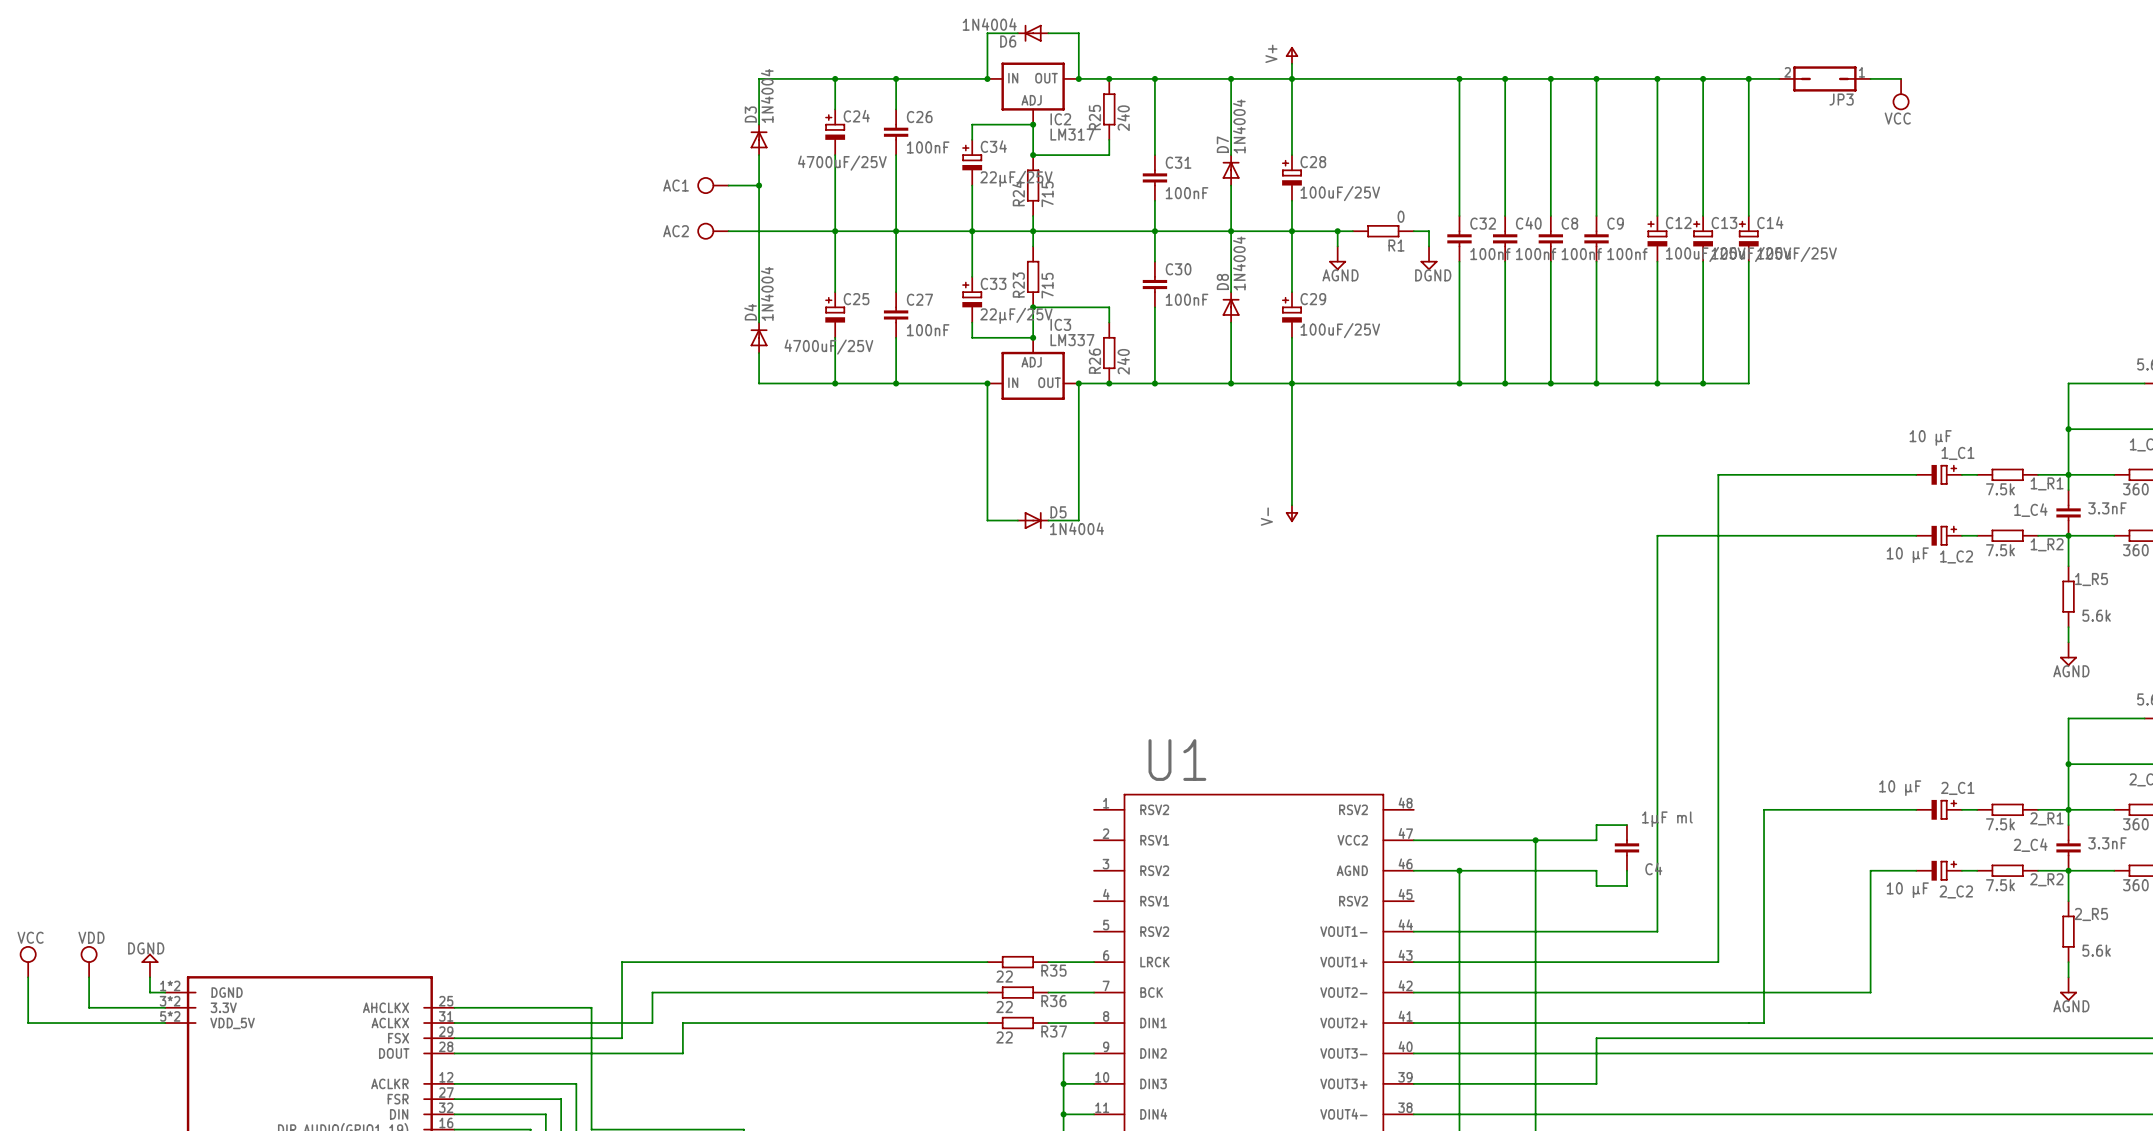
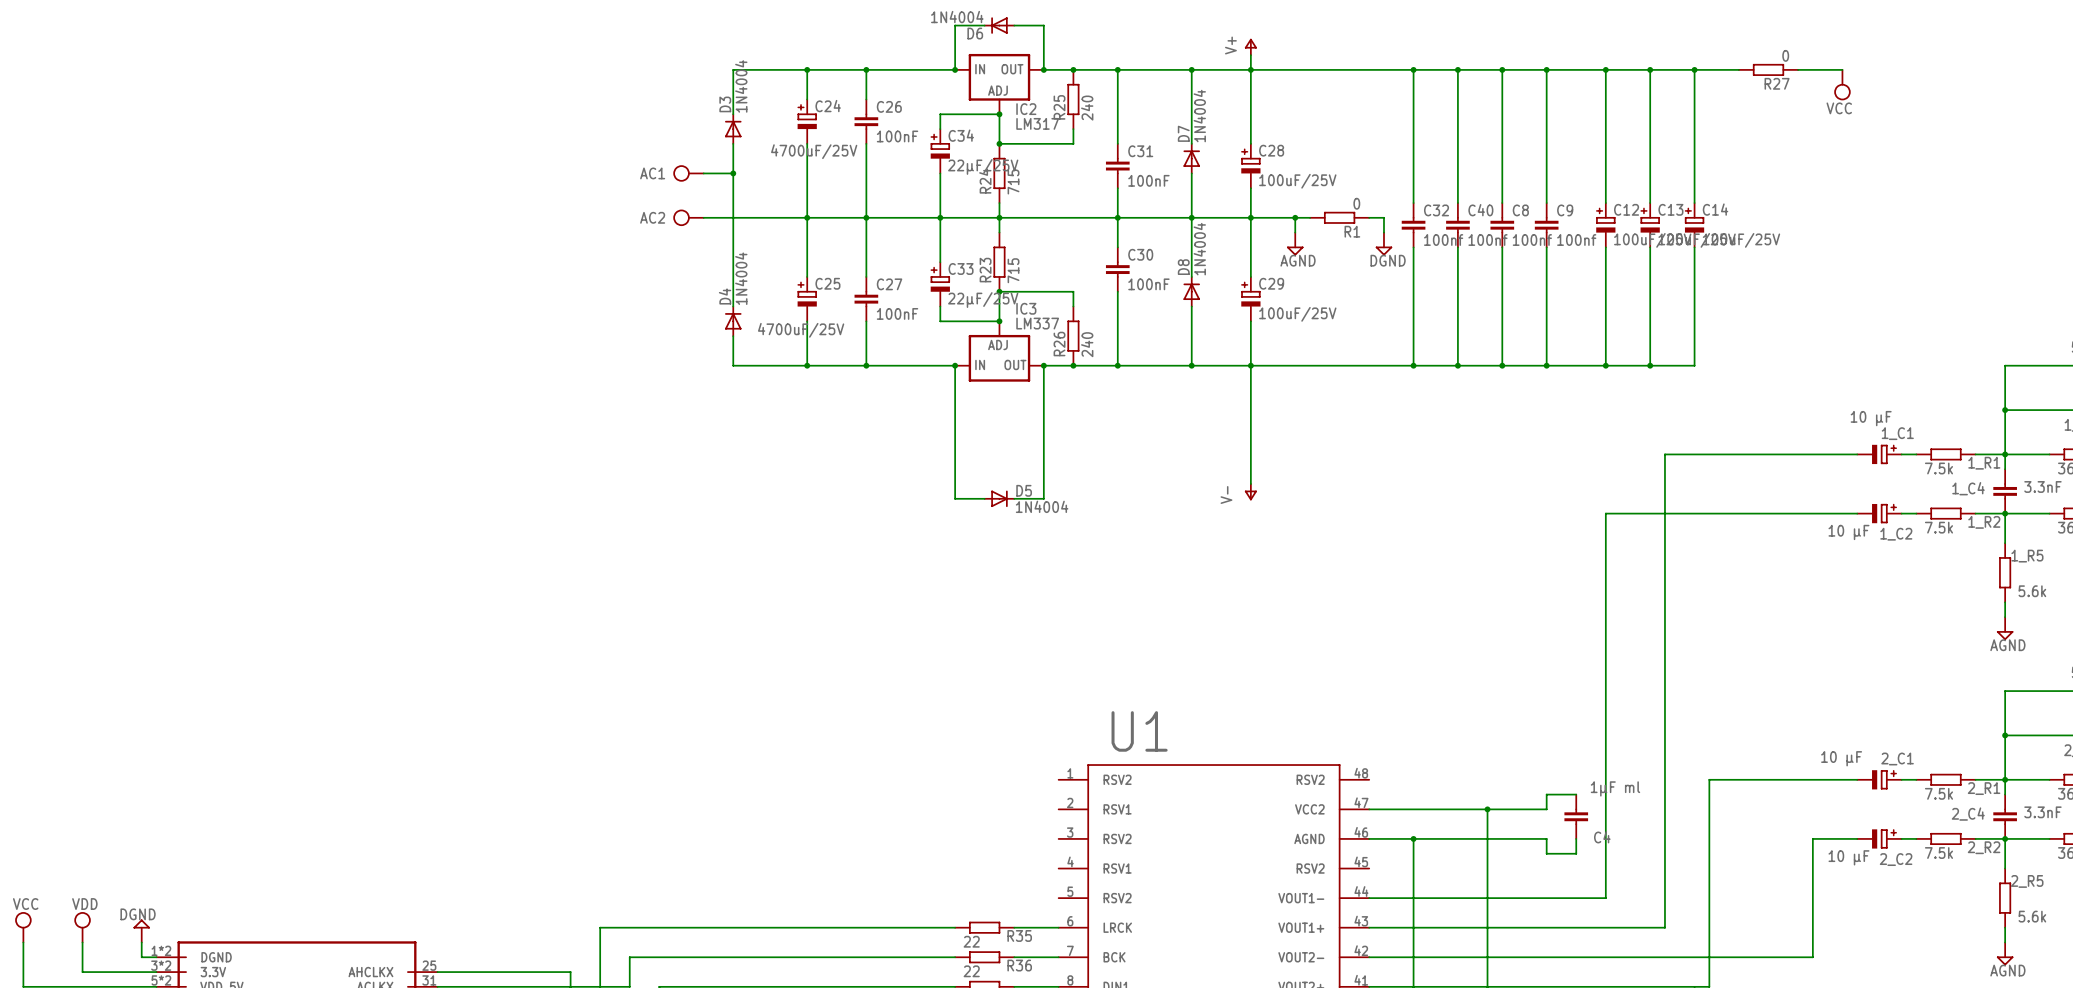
JP3: (1824, 78) -> none
R27: none -> 0 (1768, 69)

